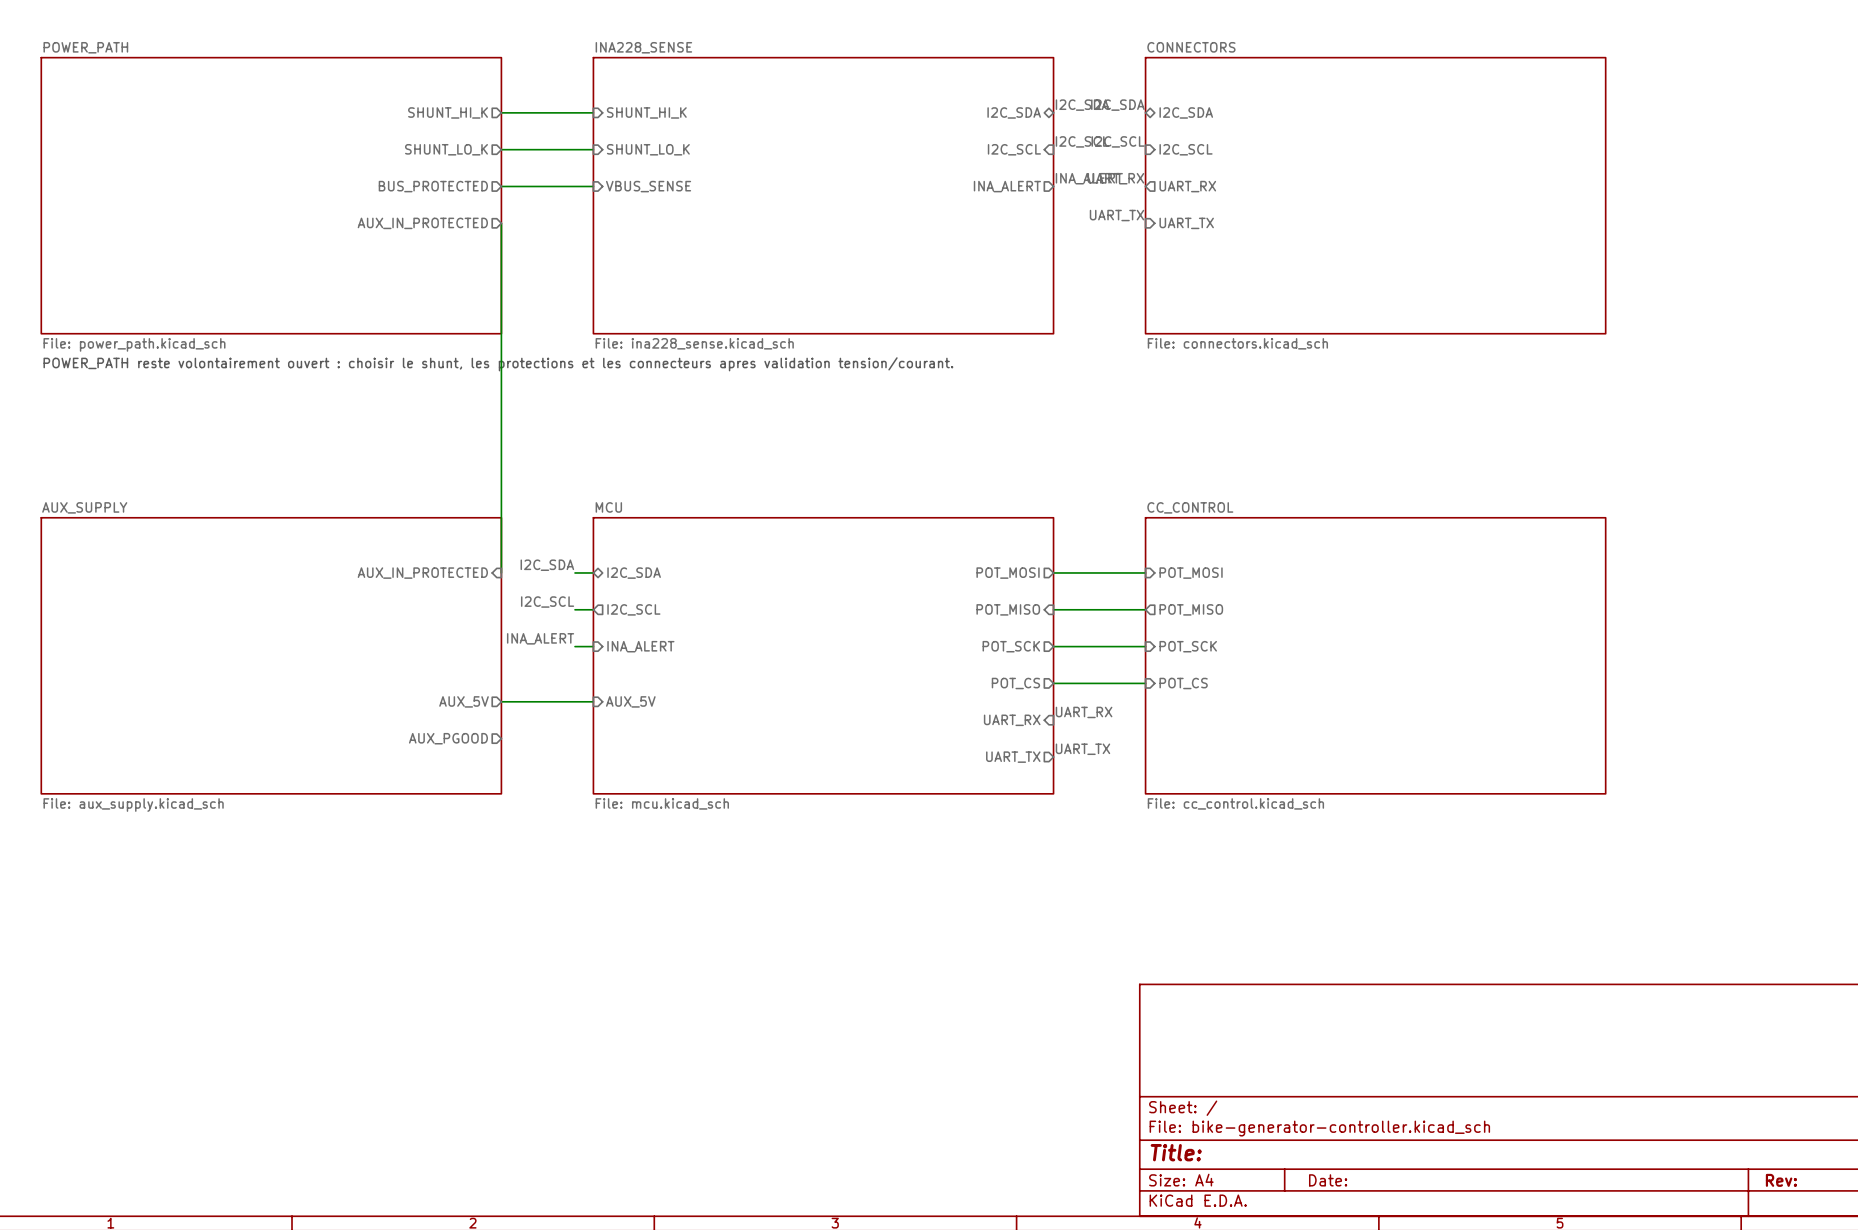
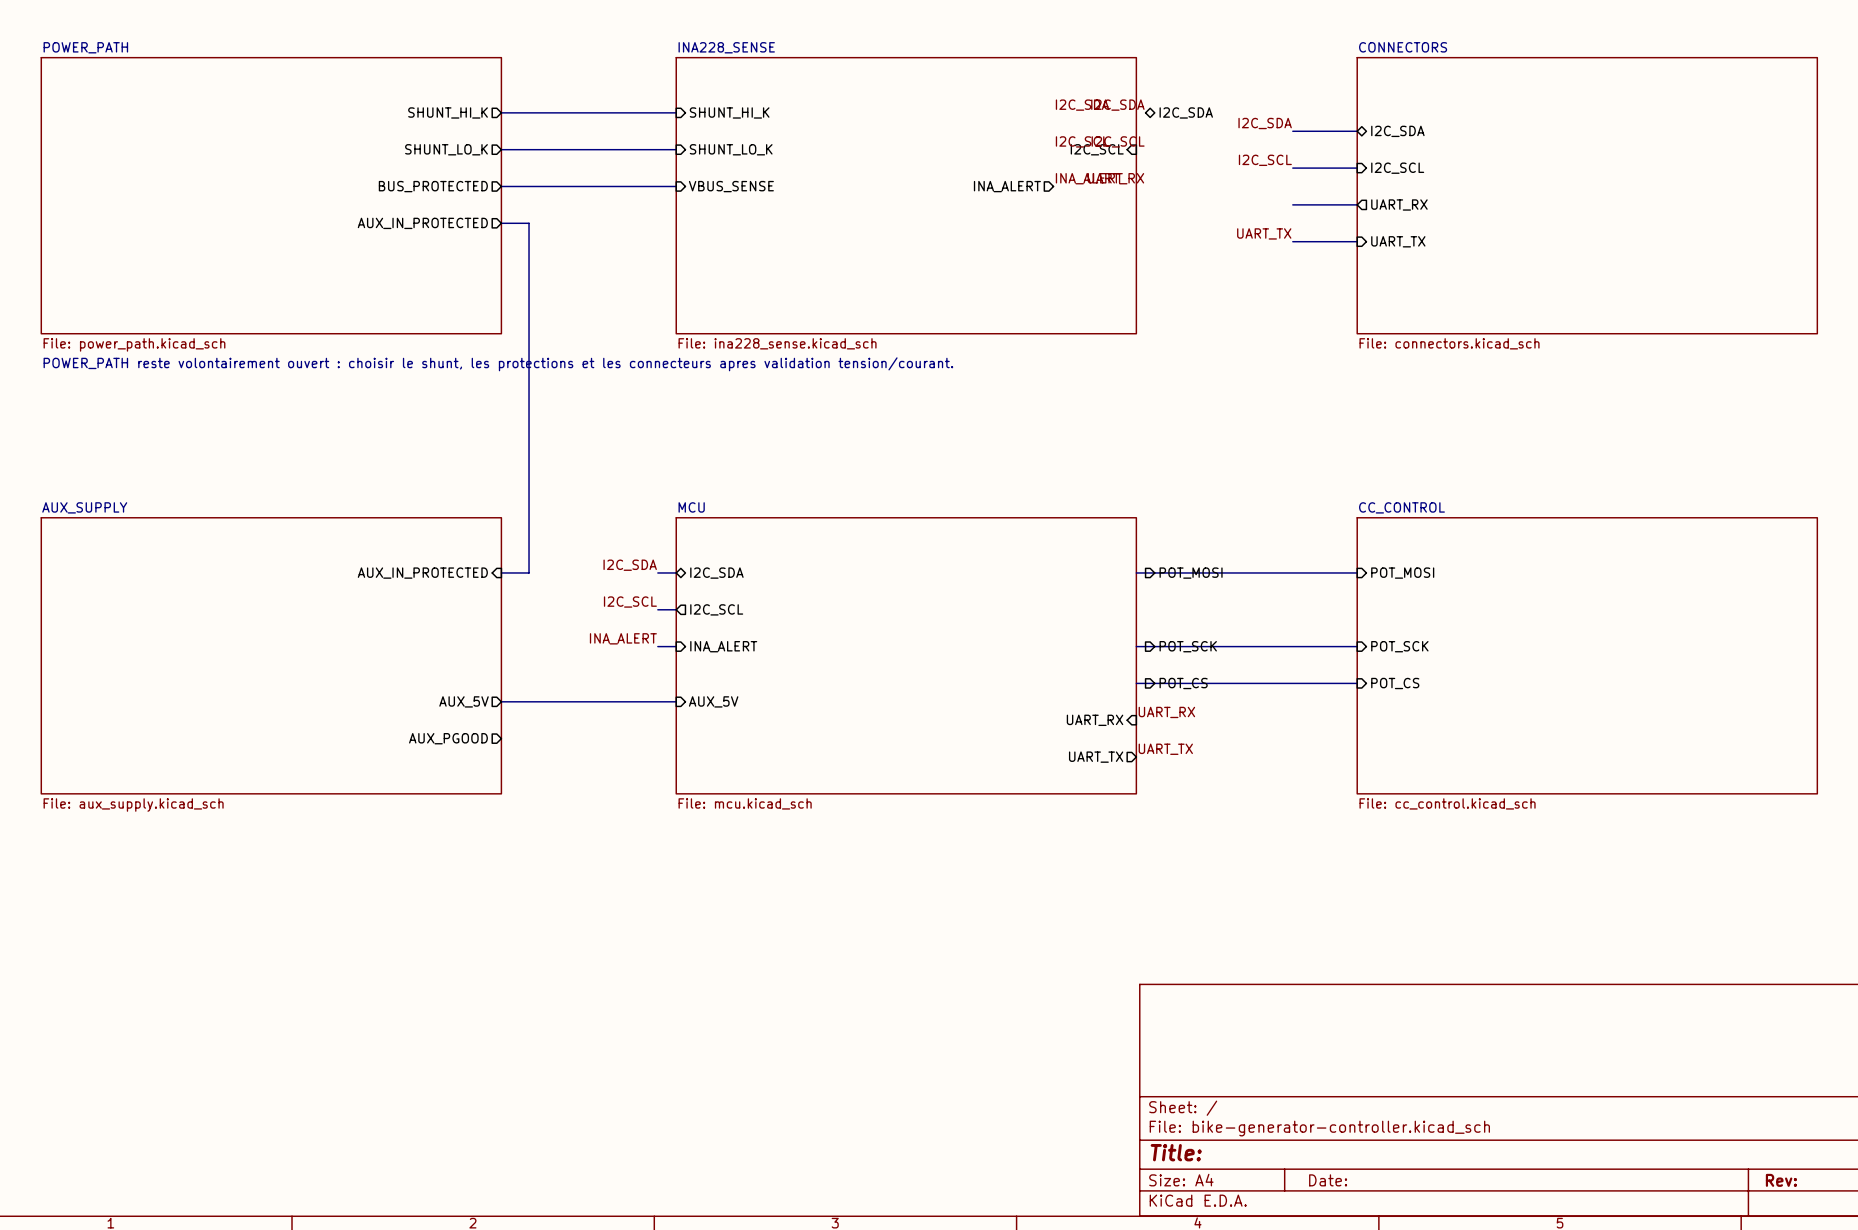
wire: none -> (593, 112) (676, 112)
sheet pin position: SHUNT_HI_K (646, 112) -> SHUNT_HI_K (729, 112)
sheet pin: I2C_SDA (1014, 112) -> none
label: none -> I2C_SDA (1265, 123)
wire: none -> (1292, 131) (1357, 131)
sheet pin: none -> I2C_SDA (1397, 131)
wire: none -> (593, 149) (676, 149)
sheet pin position: SHUNT_LO_K (648, 149) -> SHUNT_LO_K (731, 149)
sheet pin: I2C_SCL (1014, 149) -> none
sheet pin rotation: 0° (1186, 149) -> 180° (1097, 149)
sheet pin position: I2C_SCL (1186, 149) -> I2C_SCL (1097, 149)
label: none -> I2C_SCL (1265, 160)
wire: none -> (1292, 168) (1357, 168)
sheet pin: none -> I2C_SCL (1397, 168)
wire: none -> (593, 186) (676, 186)
sheet pin position: VBUS_SENSE (648, 186) -> VBUS_SENSE (731, 186)
sheet pin: UART_RX (1187, 186) -> none
sheet INA228_SENSE position: (823, 195) -> (906, 195)
sheet CONNECTORS: File: connectors.kicad_sch (1375, 195) -> none
sheet CONNECTORS: none -> File: connectors.kicad_sch (1587, 195)
wire: none -> (1292, 204) (1357, 204)
sheet pin: none -> UART_RX (1399, 204)
label position: UART_TX (1117, 215) -> UART_TX (1264, 233)
wire: (501, 223) (501, 572) -> (501, 223) (529, 223) (529, 572) (501, 572)
sheet pin: UART_TX (1186, 223) -> none
wire: none -> (1292, 241) (1357, 241)
sheet pin: none -> UART_TX (1398, 241)
label position: I2C_SDA (547, 565) -> I2C_SDA (630, 565)
wire: (575, 572) (593, 572) -> (657, 572) (676, 572)
wire: (1053, 572) (1136, 572) -> none
wire: none -> (1145, 572) (1357, 572)
sheet pin position: I2C_SDA (634, 573) -> I2C_SDA (716, 573)
sheet pin: POT_MOSI (1008, 573) -> none
sheet pin: none -> POT_MOSI (1402, 573)
label position: I2C_SCL (547, 602) -> I2C_SCL (630, 602)
wire: (575, 609) (593, 609) -> (657, 609) (676, 609)
sheet pin position: I2C_SCL (633, 609) -> I2C_SCL (716, 609)
sheet pin: POT_MISO (1008, 609) -> none
wire: (1053, 609) (1145, 609) -> none
sheet pin: POT_MISO (1191, 609) -> none
label position: INA_ALERT (540, 638) -> INA_ALERT (623, 638)
wire: (575, 646) (593, 646) -> (657, 646) (676, 646)
sheet pin position: INA_ALERT (640, 646) -> INA_ALERT (723, 646)
sheet pin: POT_SCK (1011, 646) -> none
wire: (1053, 646) (1136, 646) -> none
wire: none -> (1145, 646) (1357, 646)
sheet pin: none -> POT_SCK (1399, 646)
sheet MCU position: (823, 655) -> (906, 655)
sheet CC_CONTROL: File: cc_control.kicad_sch (1375, 655) -> none
sheet CC_CONTROL: none -> File: cc_control.kicad_sch (1587, 655)
sheet pin: POT_CS (1015, 683) -> none
wire: (1053, 683) (1136, 683) -> none
wire: none -> (1145, 683) (1357, 683)
sheet pin: none -> POT_CS (1395, 683)
wire: none -> (593, 701) (676, 701)
sheet pin position: AUX_5V (630, 701) -> AUX_5V (713, 701)
label position: UART_RX (1084, 712) -> UART_RX (1166, 712)
sheet pin position: UART_RX (1012, 720) -> UART_RX (1095, 720)
label position: UART_TX (1082, 749) -> UART_TX (1165, 749)
sheet pin position: UART_TX (1013, 757) -> UART_TX (1096, 757)

